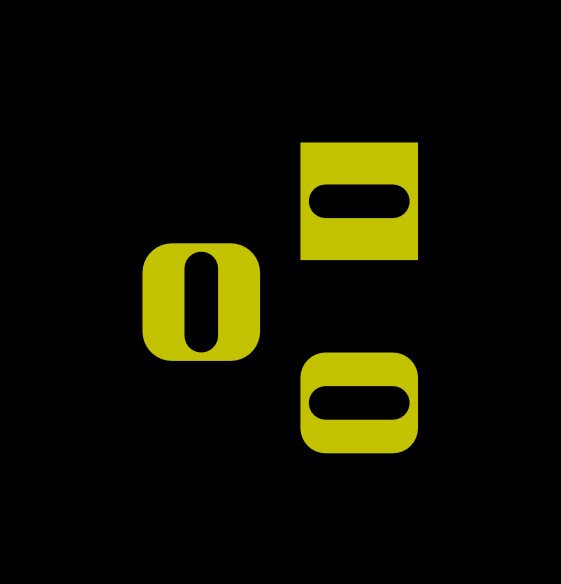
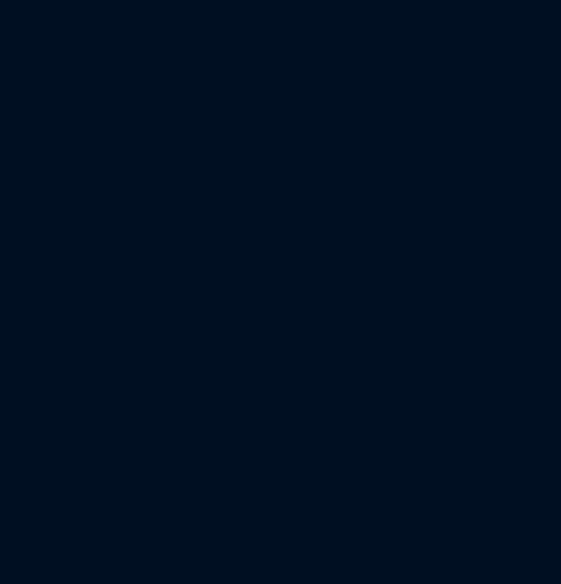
part: (280, 297) -> none

